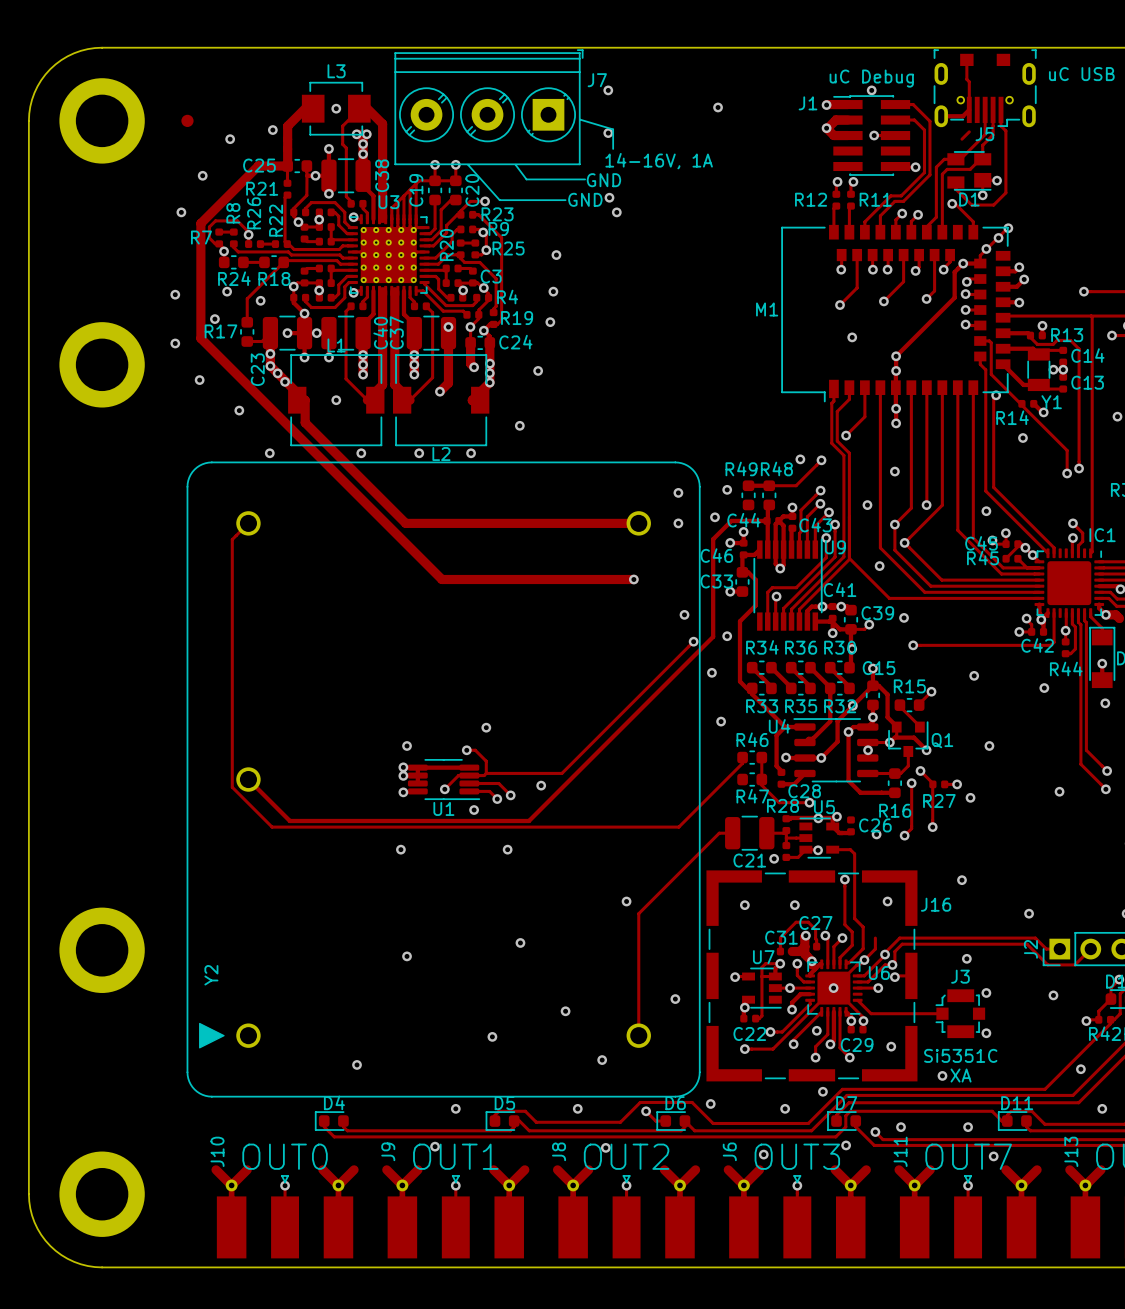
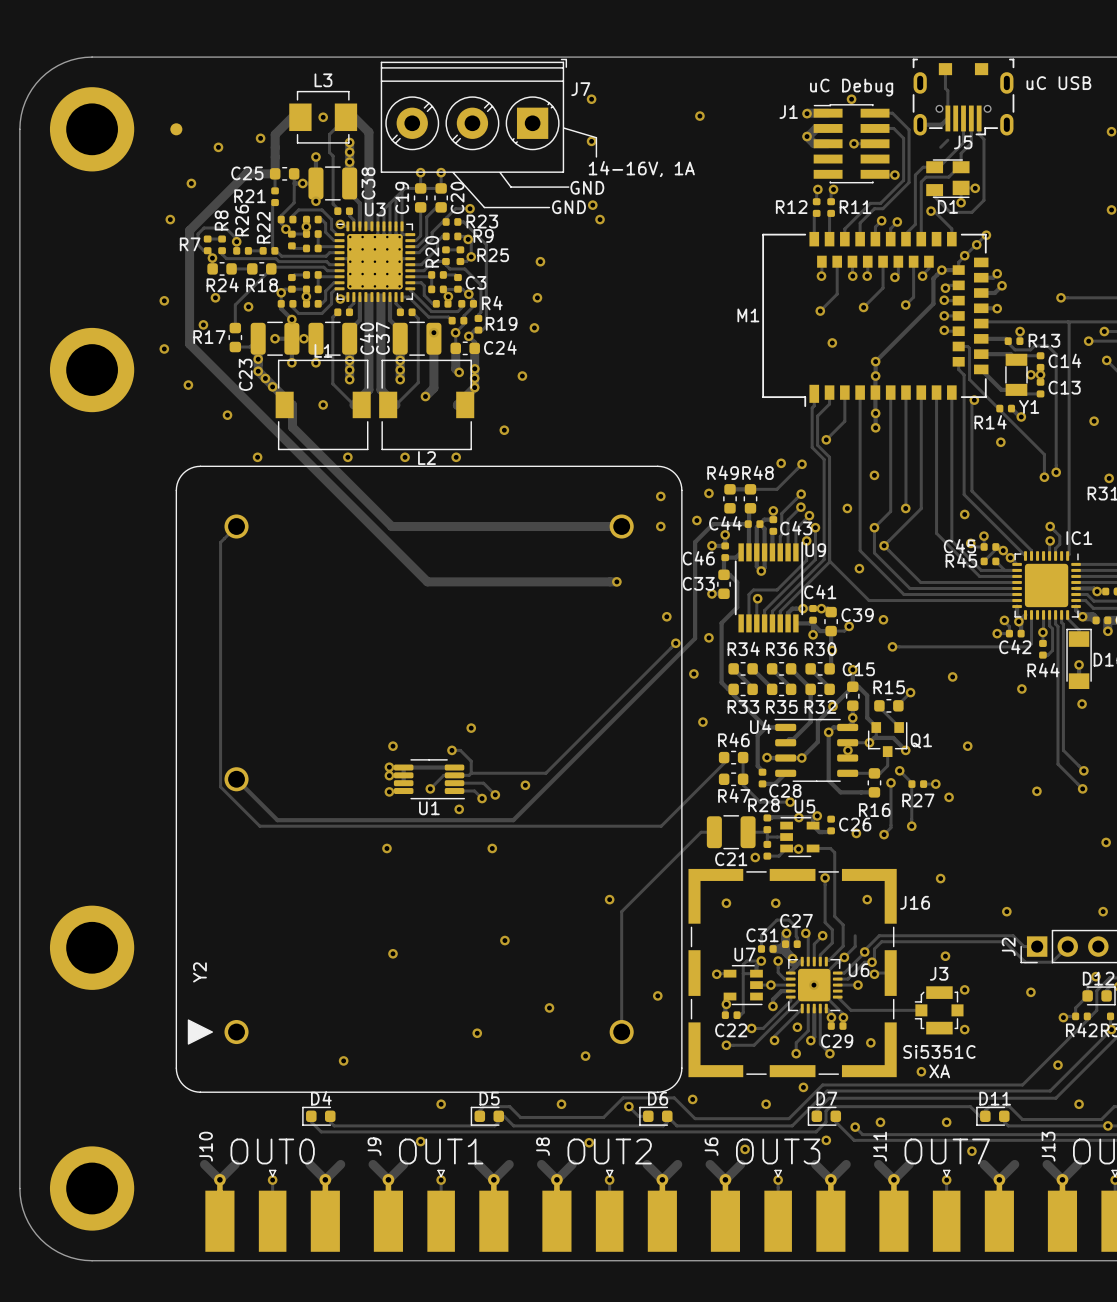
via: (356, 134) -> none
via: none -> (349, 142)
via: (366, 134) -> none

